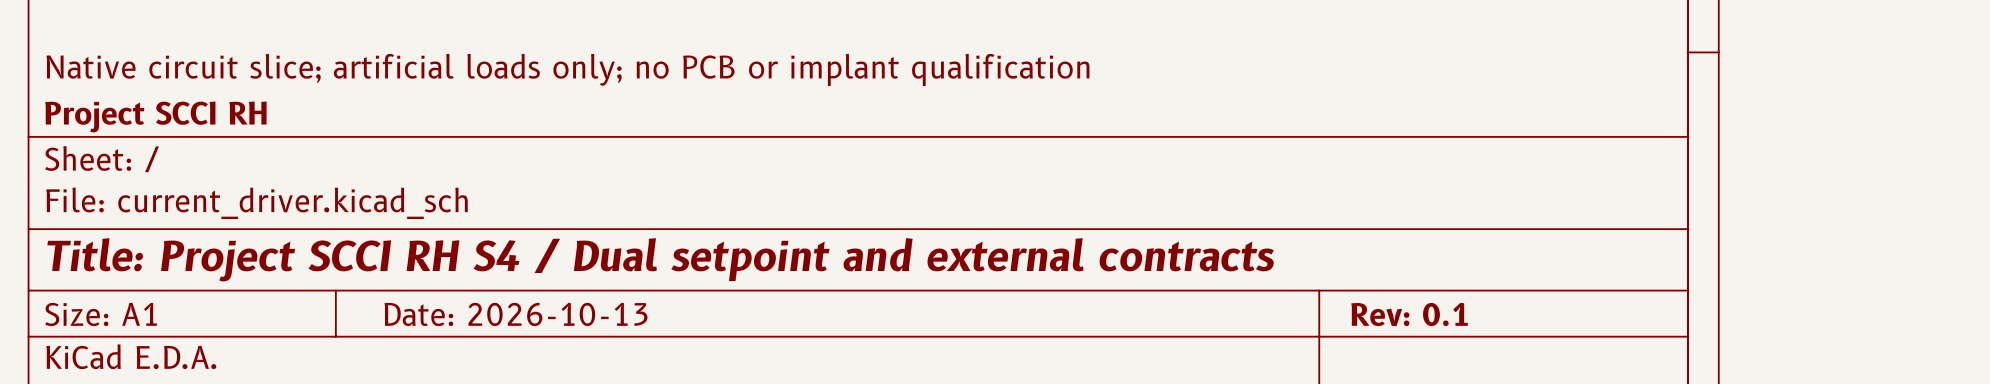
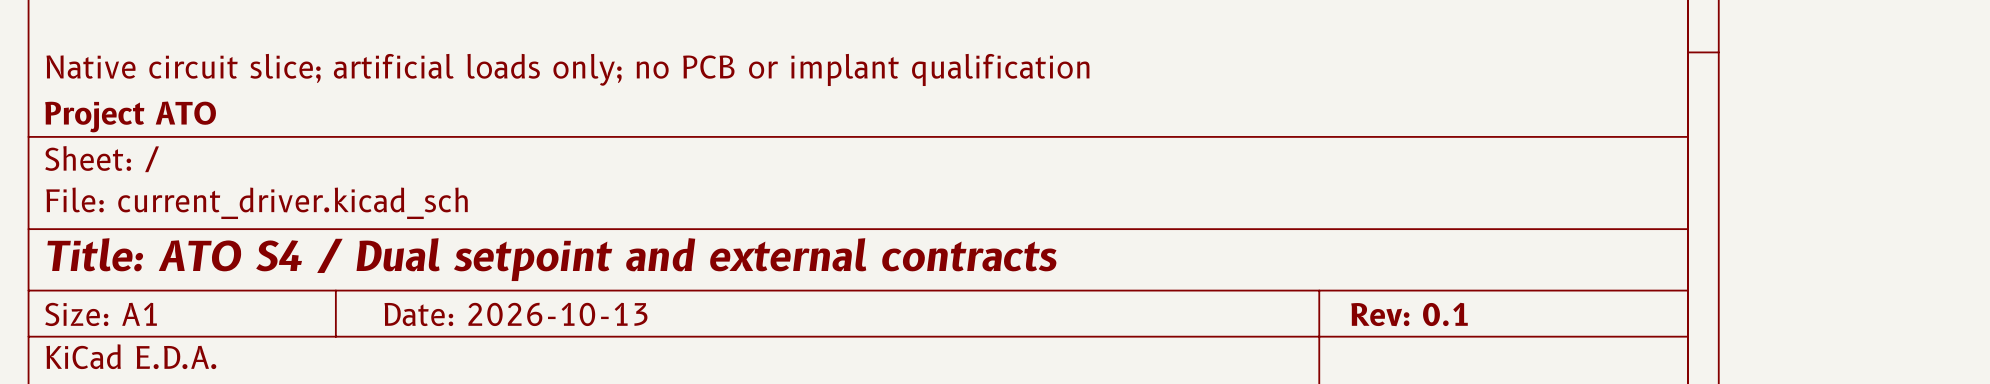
title block: Project SCCI RH (155, 116) -> Project ATO (130, 116)
title block: Title: Project SCCI RH S4 / Dual setpoint and external contracts (660, 259) -> Title: ATO S4 / Dual setpoint and external contracts (551, 259)

